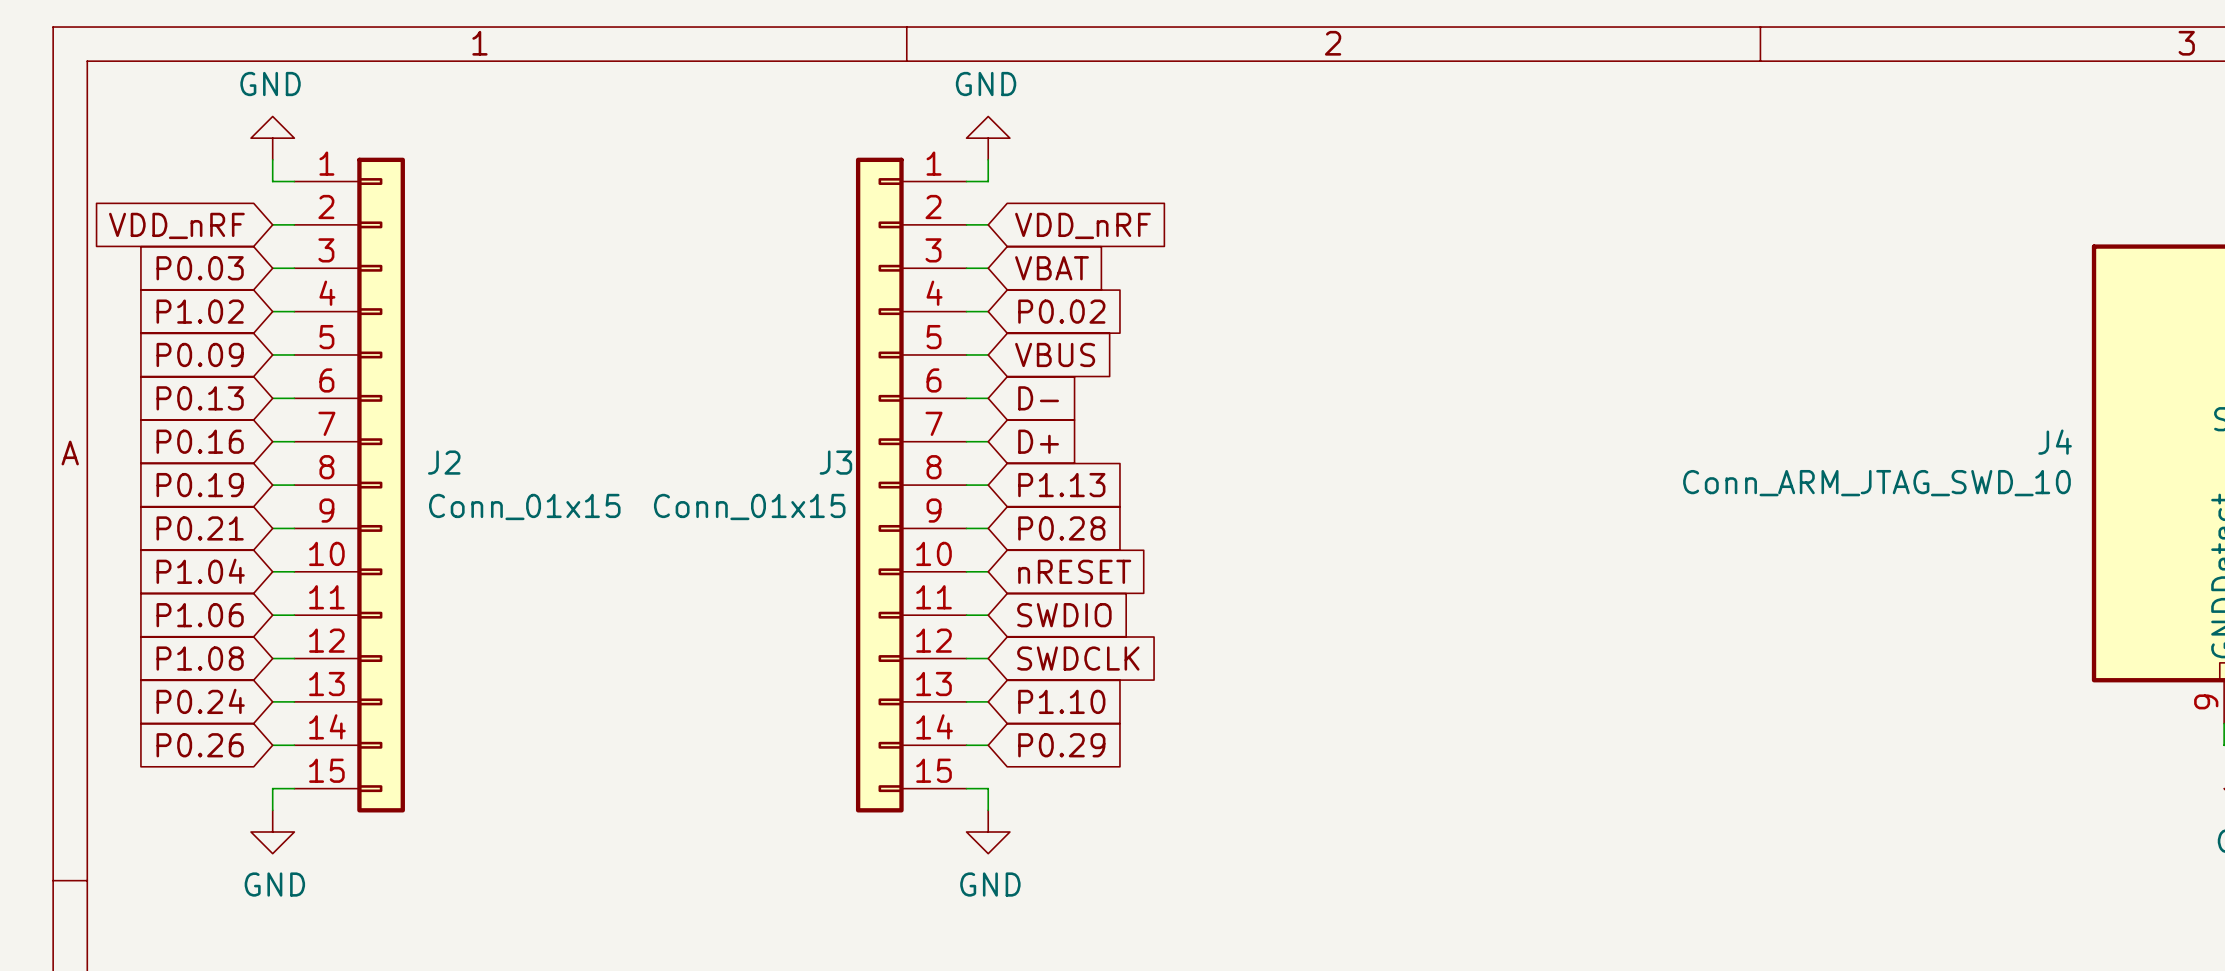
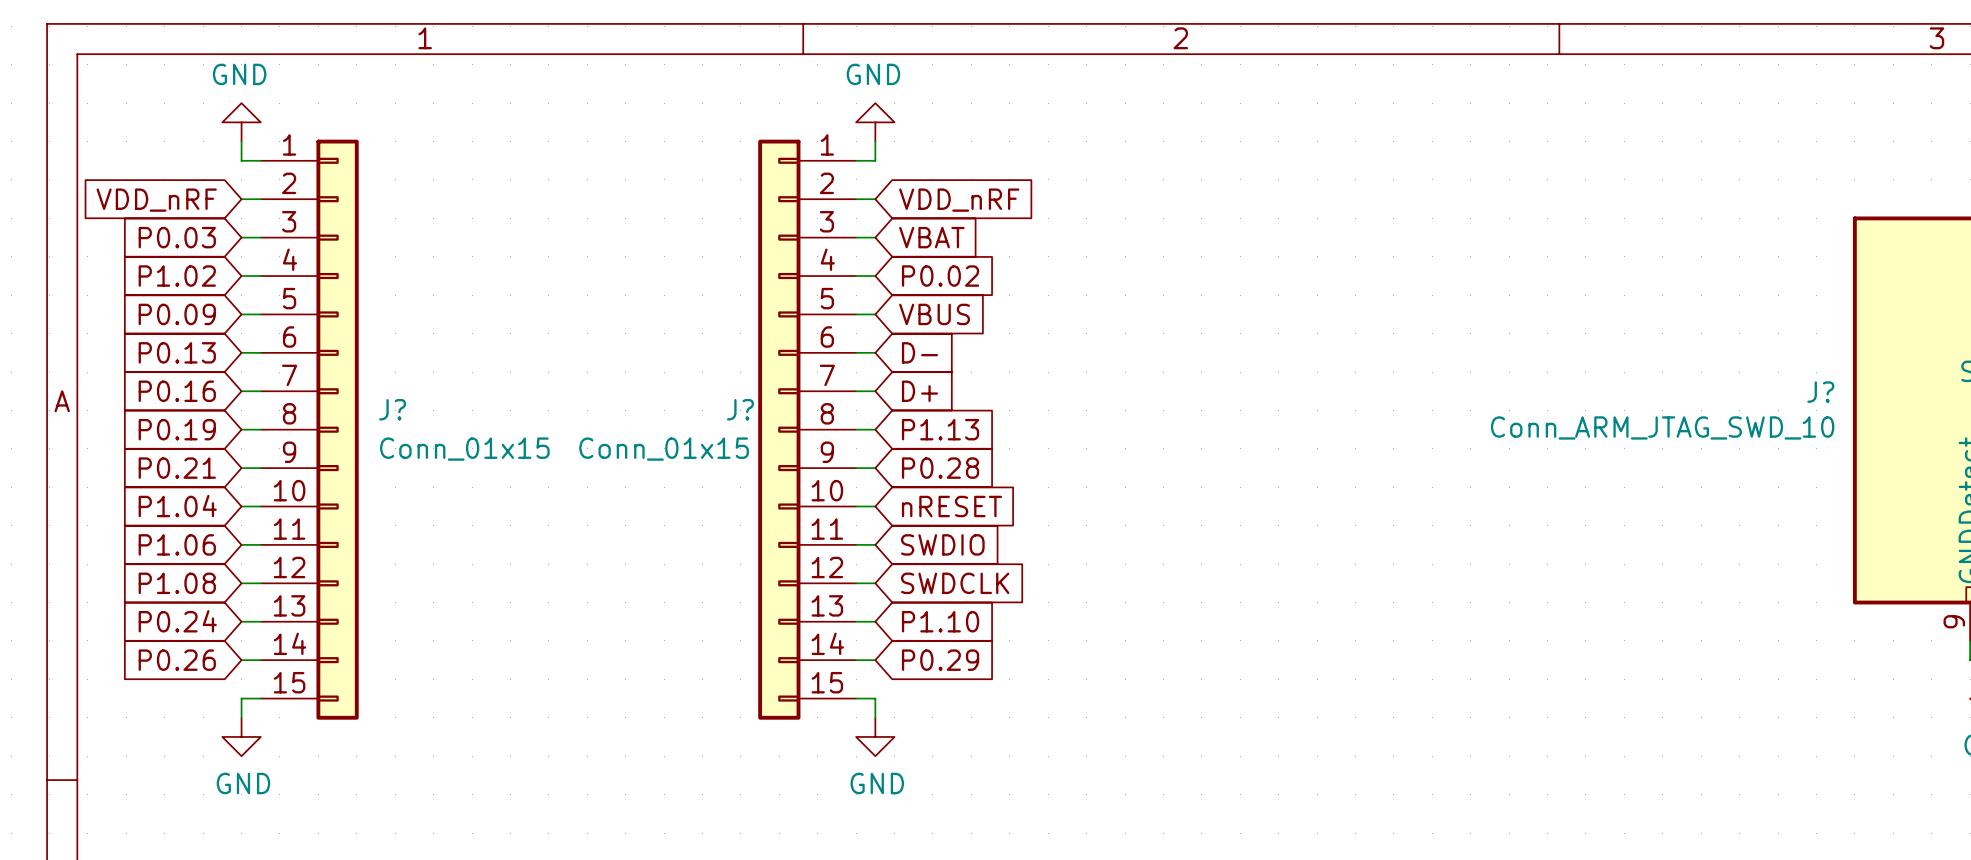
J4 name: J4 (2055, 442) -> J? (1820, 392)
J2 name: J2 (444, 462) -> J? (392, 409)
J3 name: J3 (835, 462) -> J? (740, 409)

